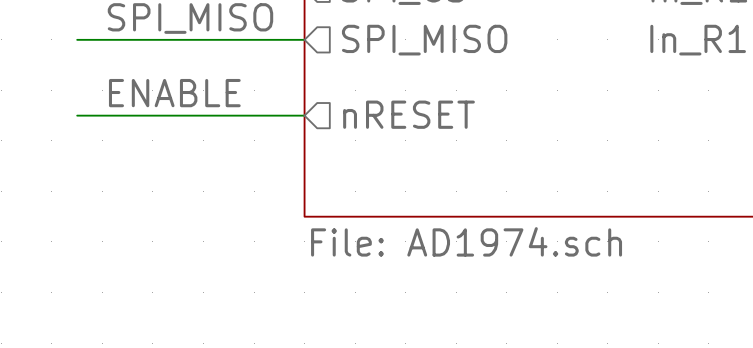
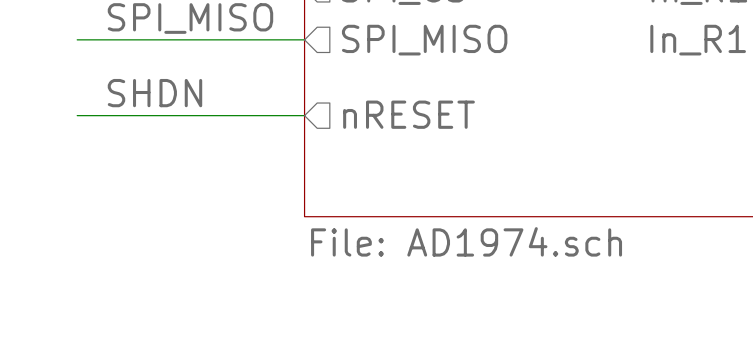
label: ENABLE (174, 93) -> SHDN (154, 93)

